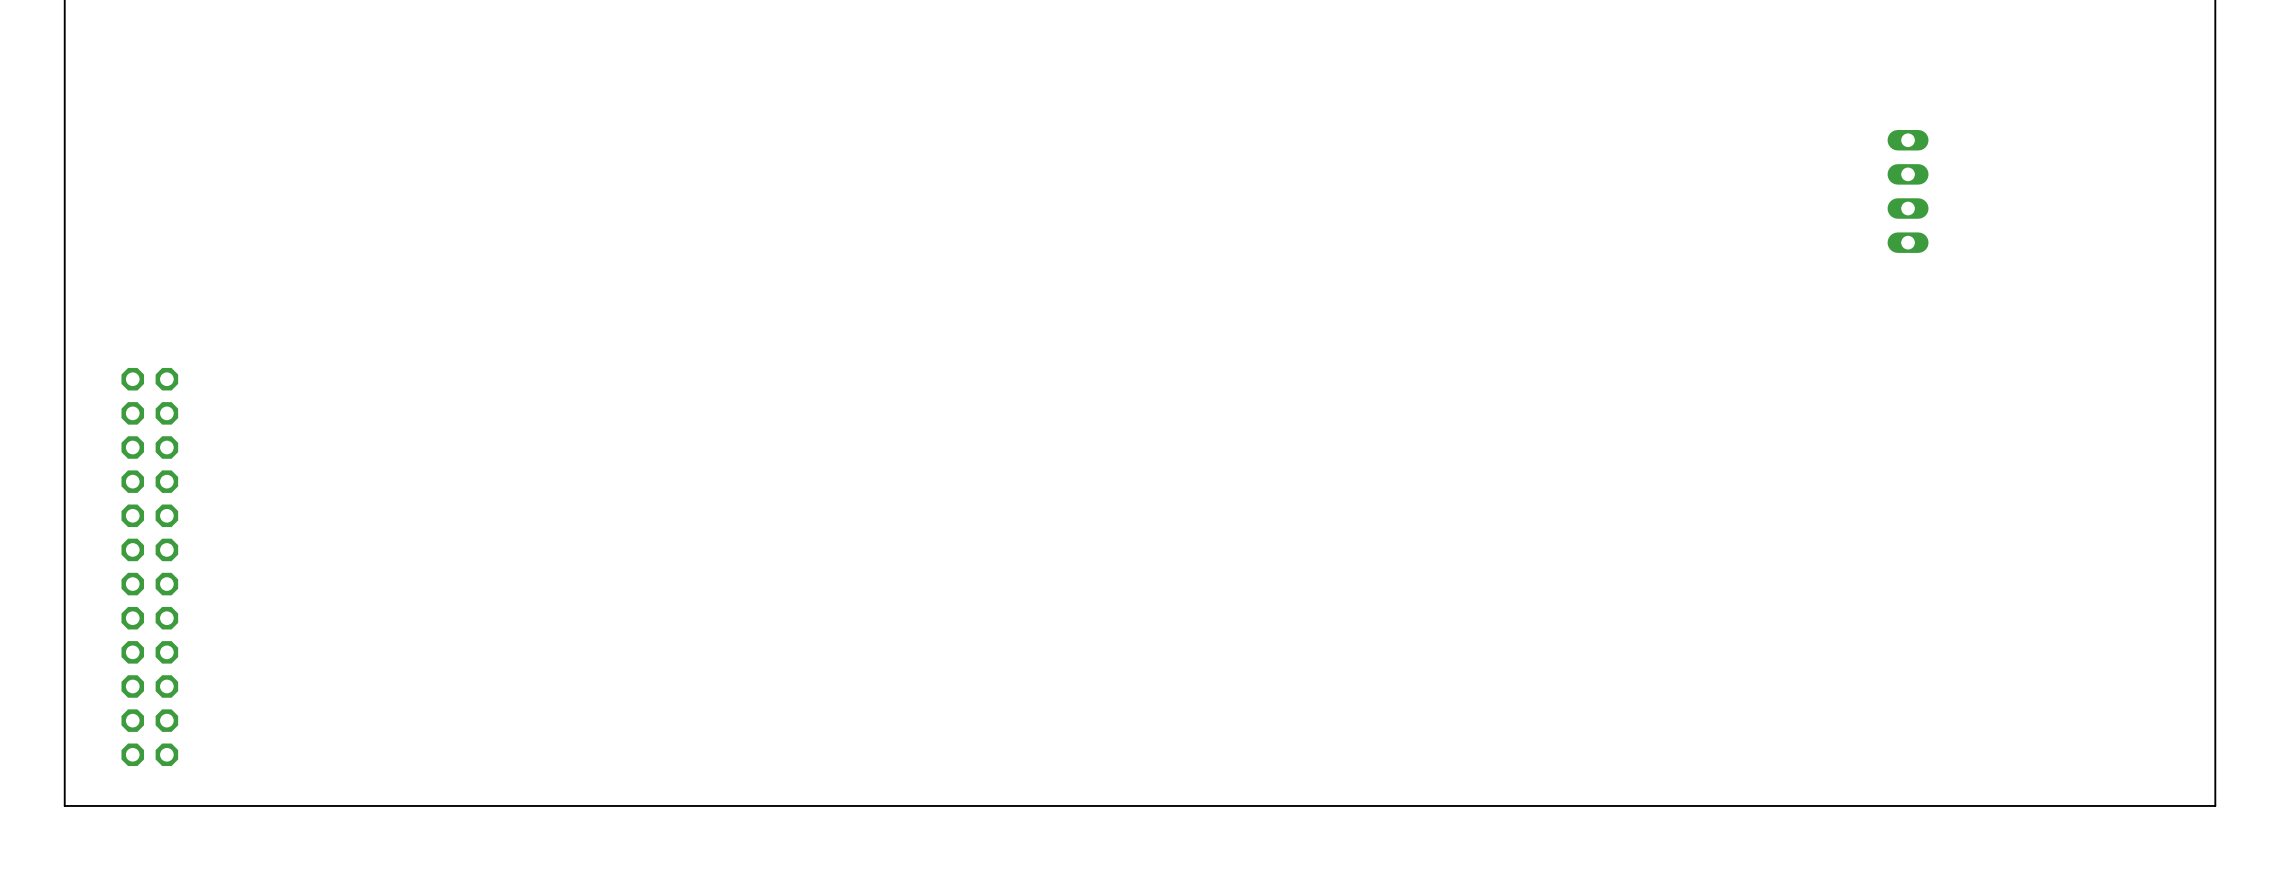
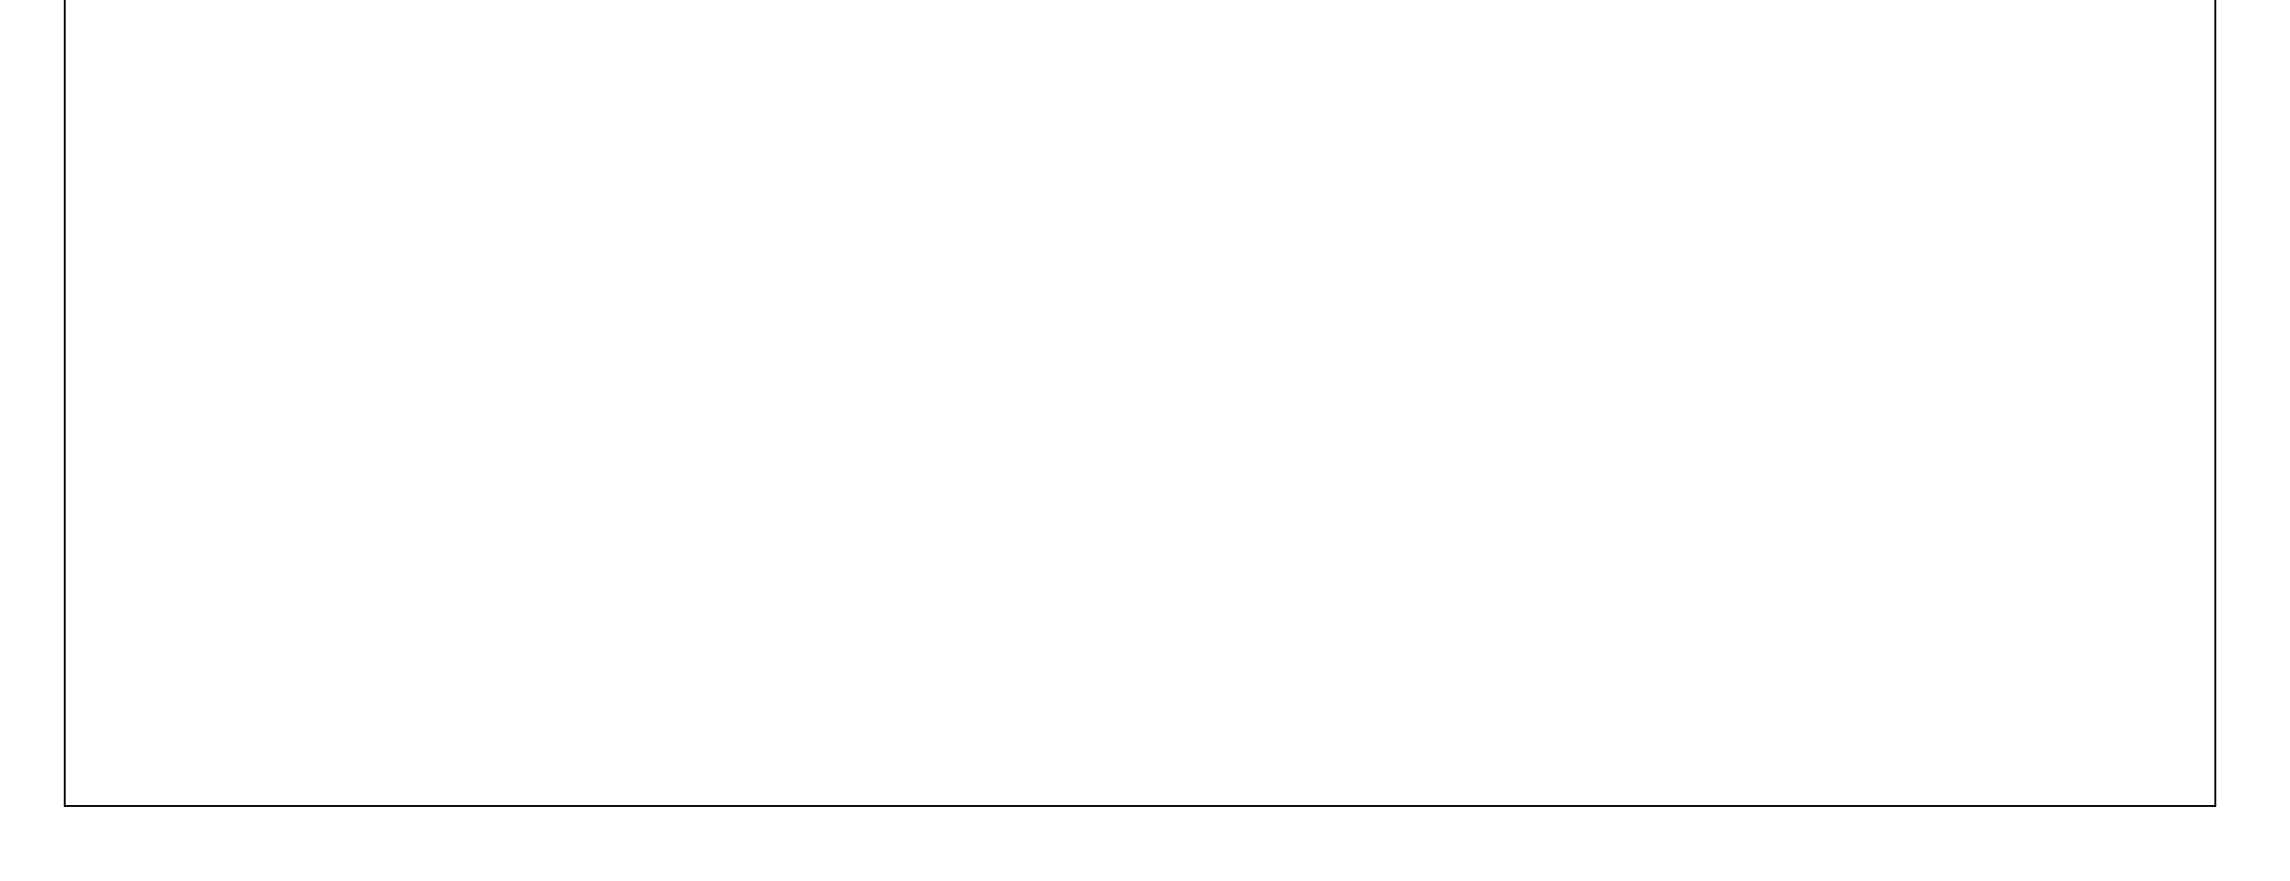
part: (1908, 191) -> none
part: (149, 567) -> none

